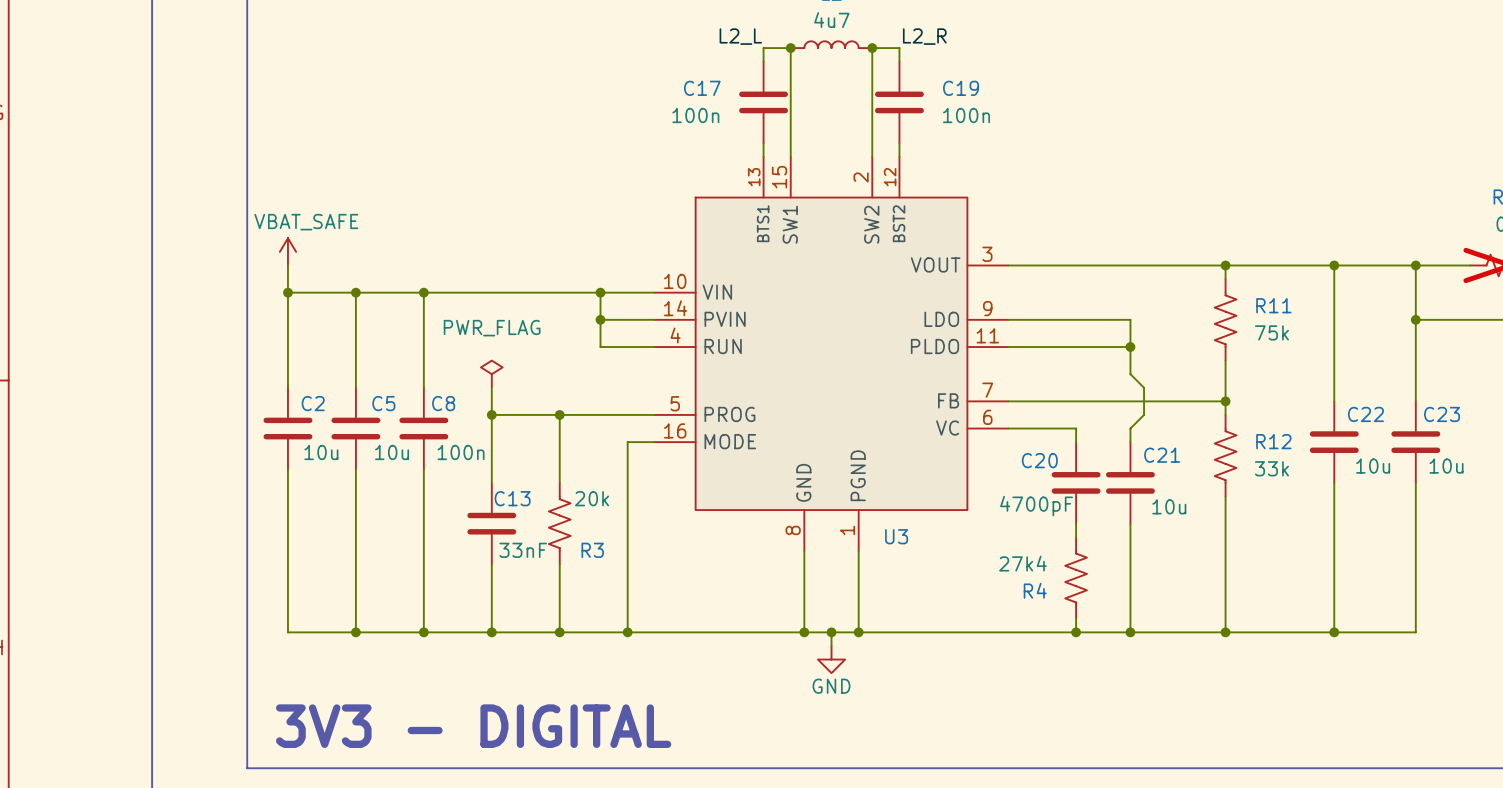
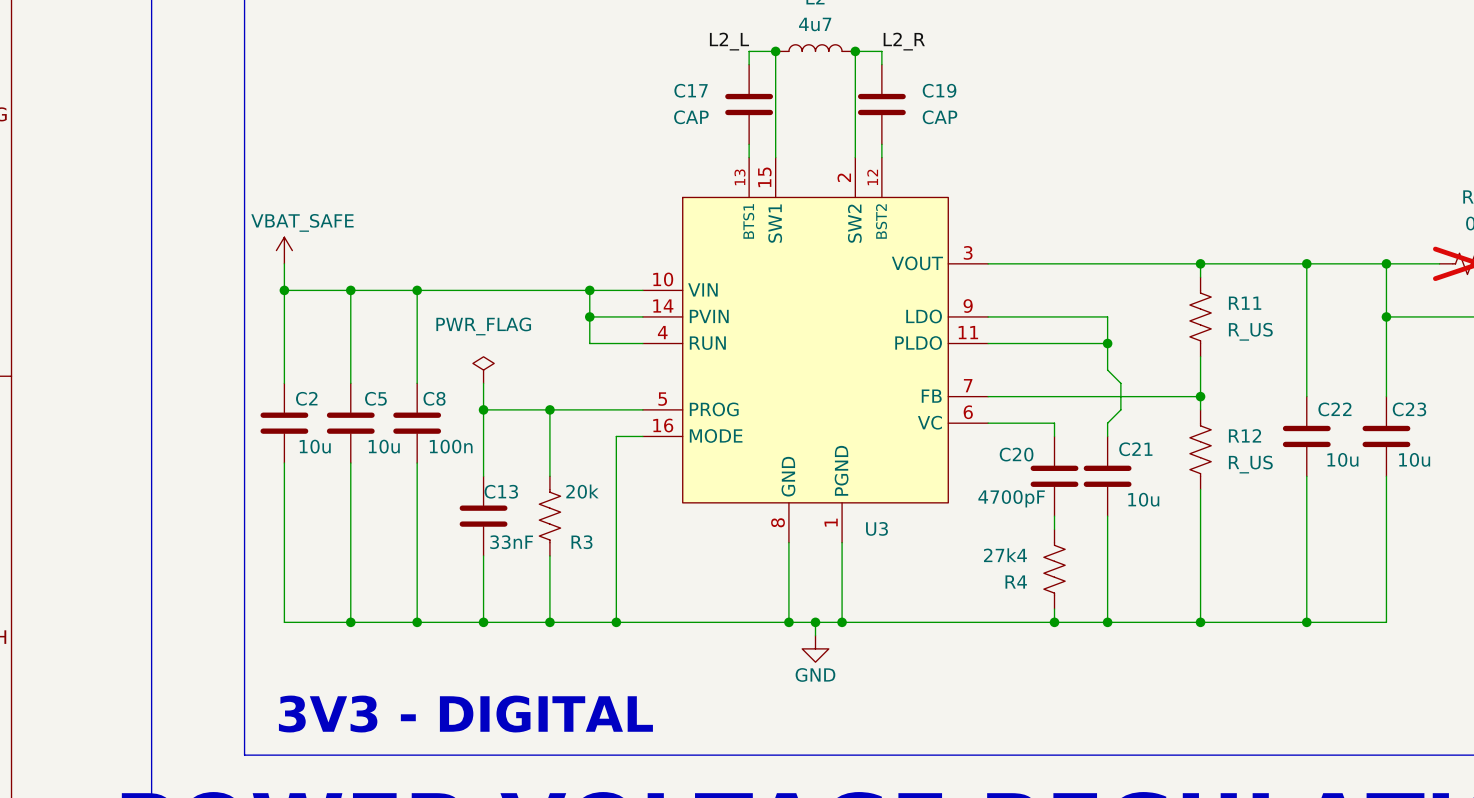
C17 value: 100n (695, 115) -> CAP (691, 117)
C19 value: 100n (966, 115) -> CAP (940, 117)
R11 value: 75k (1271, 332) -> R_US (1250, 331)
R12 value: 33k (1271, 468) -> R_US (1250, 464)

